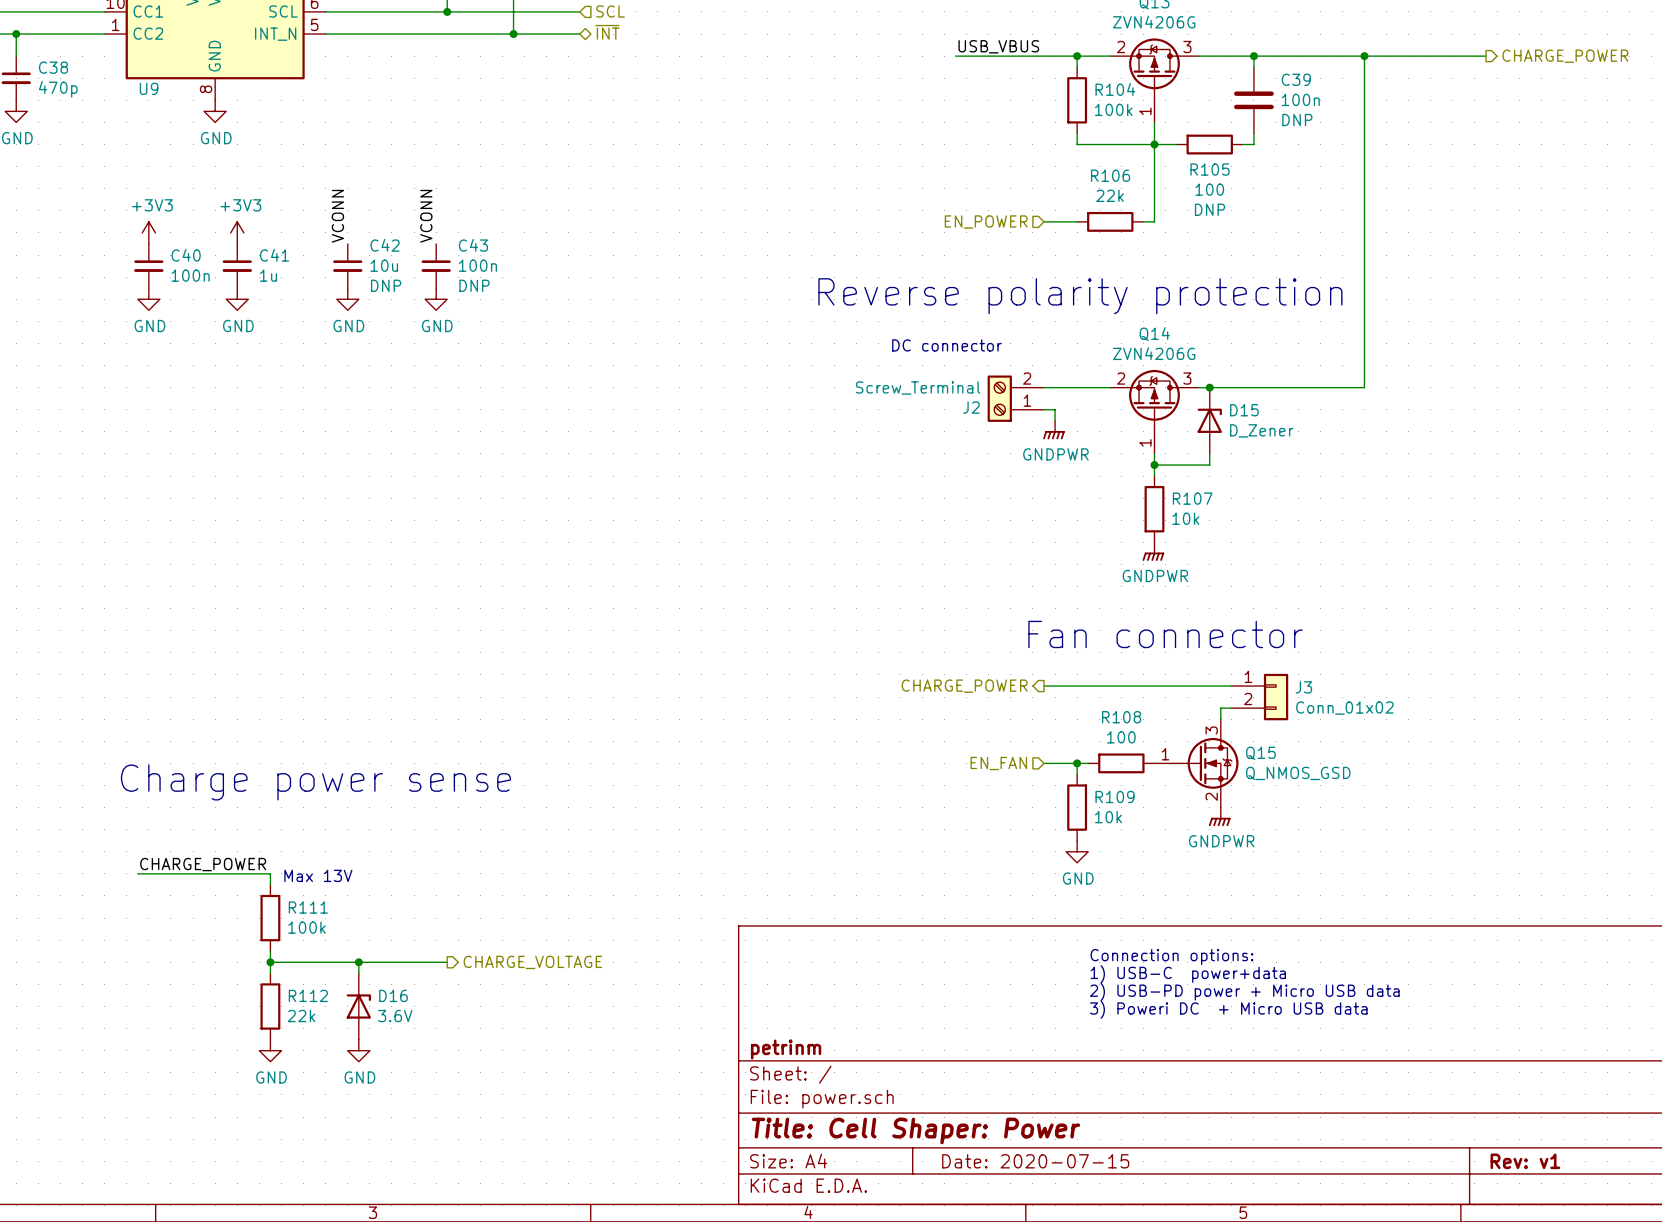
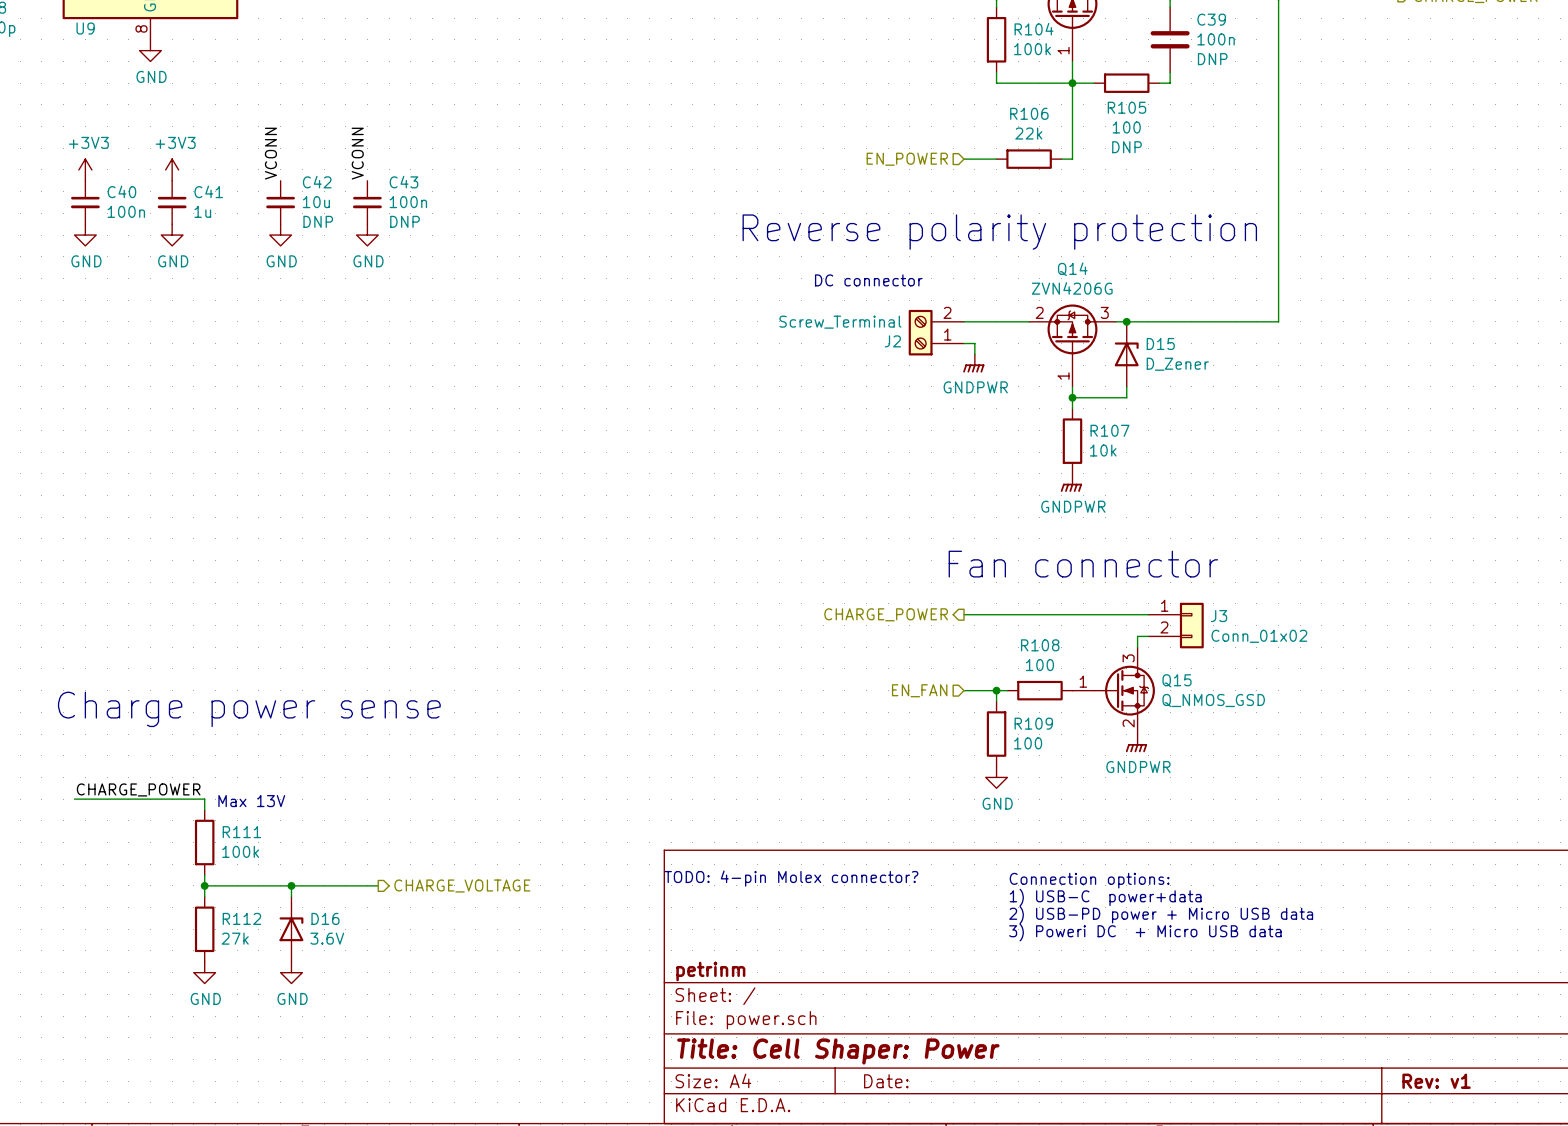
R109 value: 10k (1108, 817) -> 100 (1028, 743)
text: none -> TODO: 4-pin Molex connector? (791, 878)
R112 value: 22k (301, 1016) -> 27k (235, 938)
title block: Date: 2020-07-15 (1035, 1161) -> Date: (886, 1081)

